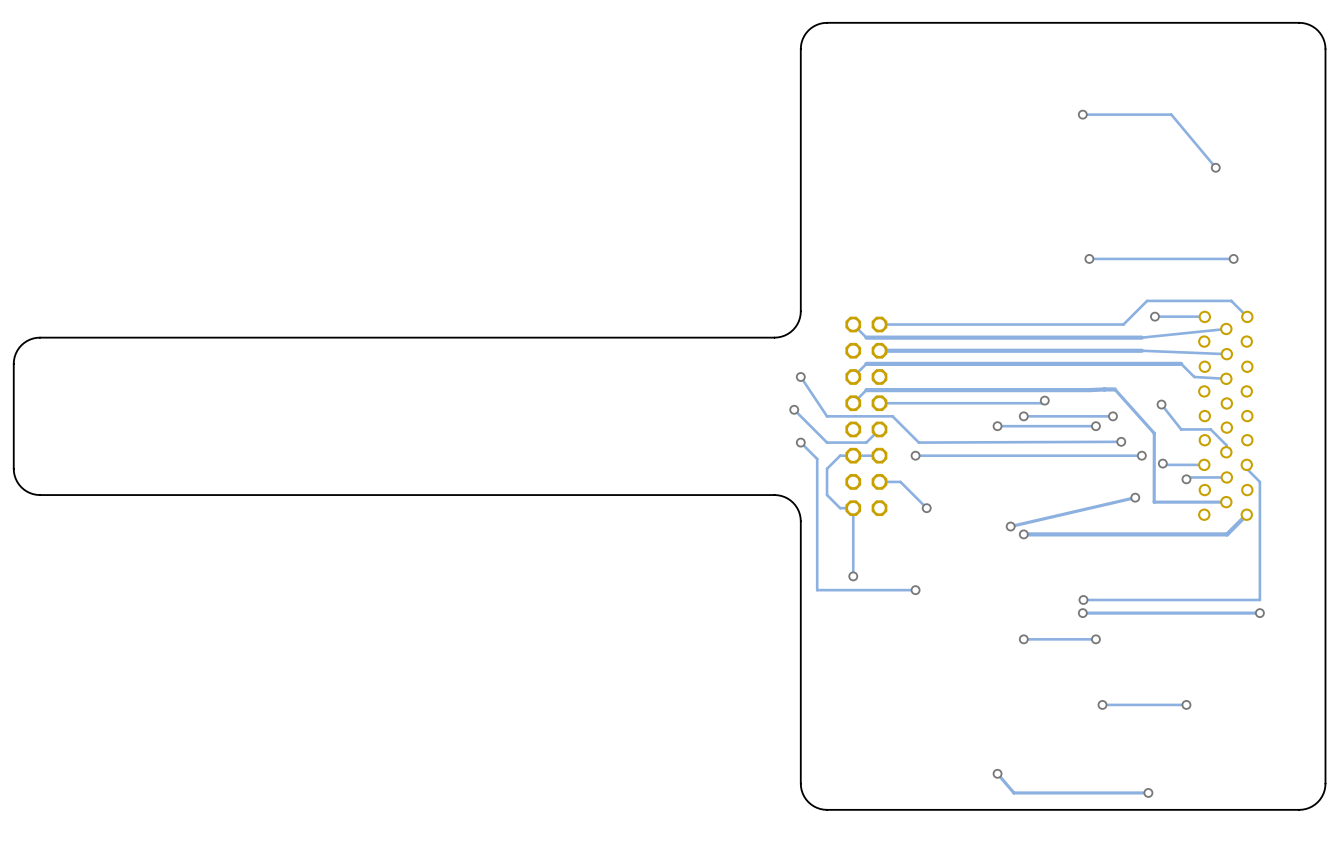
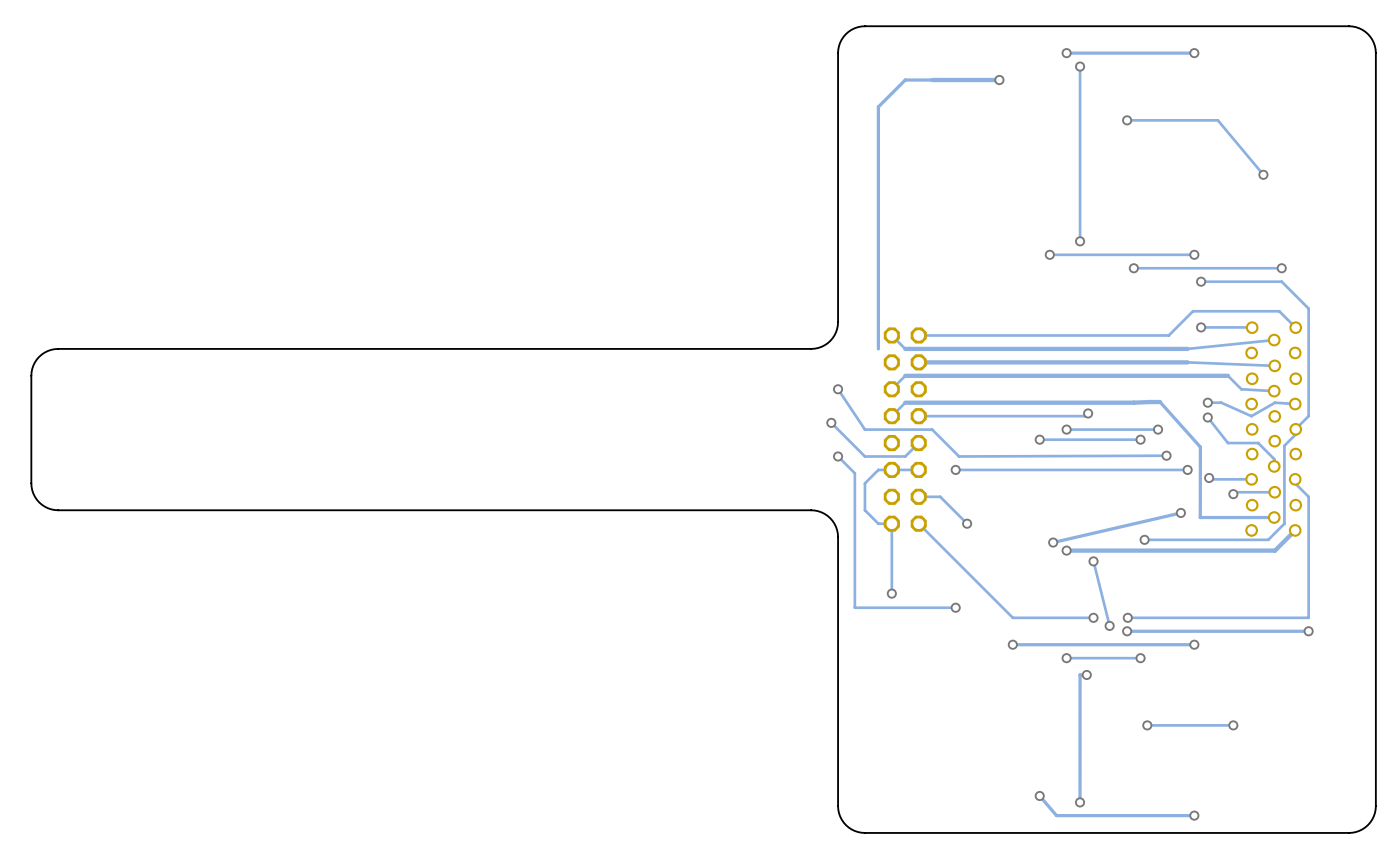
via: none -> (1066, 53)
track: none -> (1194, 53) (1066, 53)
via: none -> (1194, 53)
track: none -> (1080, 66) (1080, 241)
via: none -> (1080, 66)
track: none -> (999, 80) (905, 80) (878, 106) (878, 348)
via: none -> (999, 80)
via: none -> (1080, 241)
via: none -> (1049, 254)
track: none -> (1194, 254) (1049, 254)
via: none -> (1194, 254)
track: none -> (1201, 281) (1281, 281) (1308, 308) (1308, 416) (1295, 429) (1295, 434) (1284, 445) (1284, 523) (1268, 539) (1144, 539)
via: none -> (1201, 281)
track: none -> (1207, 402) (1221, 402) (1251, 416) (1275, 402) (1295, 404)
via: none -> (1207, 402)
track: none -> (918, 523) (1012, 617) (1093, 617)
via: none -> (1144, 539)
track: none -> (1093, 561) (1109, 625)
via: none -> (1093, 561)
via: none -> (1093, 617)
via: none -> (1109, 625)
via: none -> (1012, 644)
track: none -> (1194, 644) (1012, 644)
via: none -> (1194, 644)
track: none -> (1086, 674) (1080, 674) (1080, 802)
via: none -> (1086, 674)
via: none -> (1080, 802)

